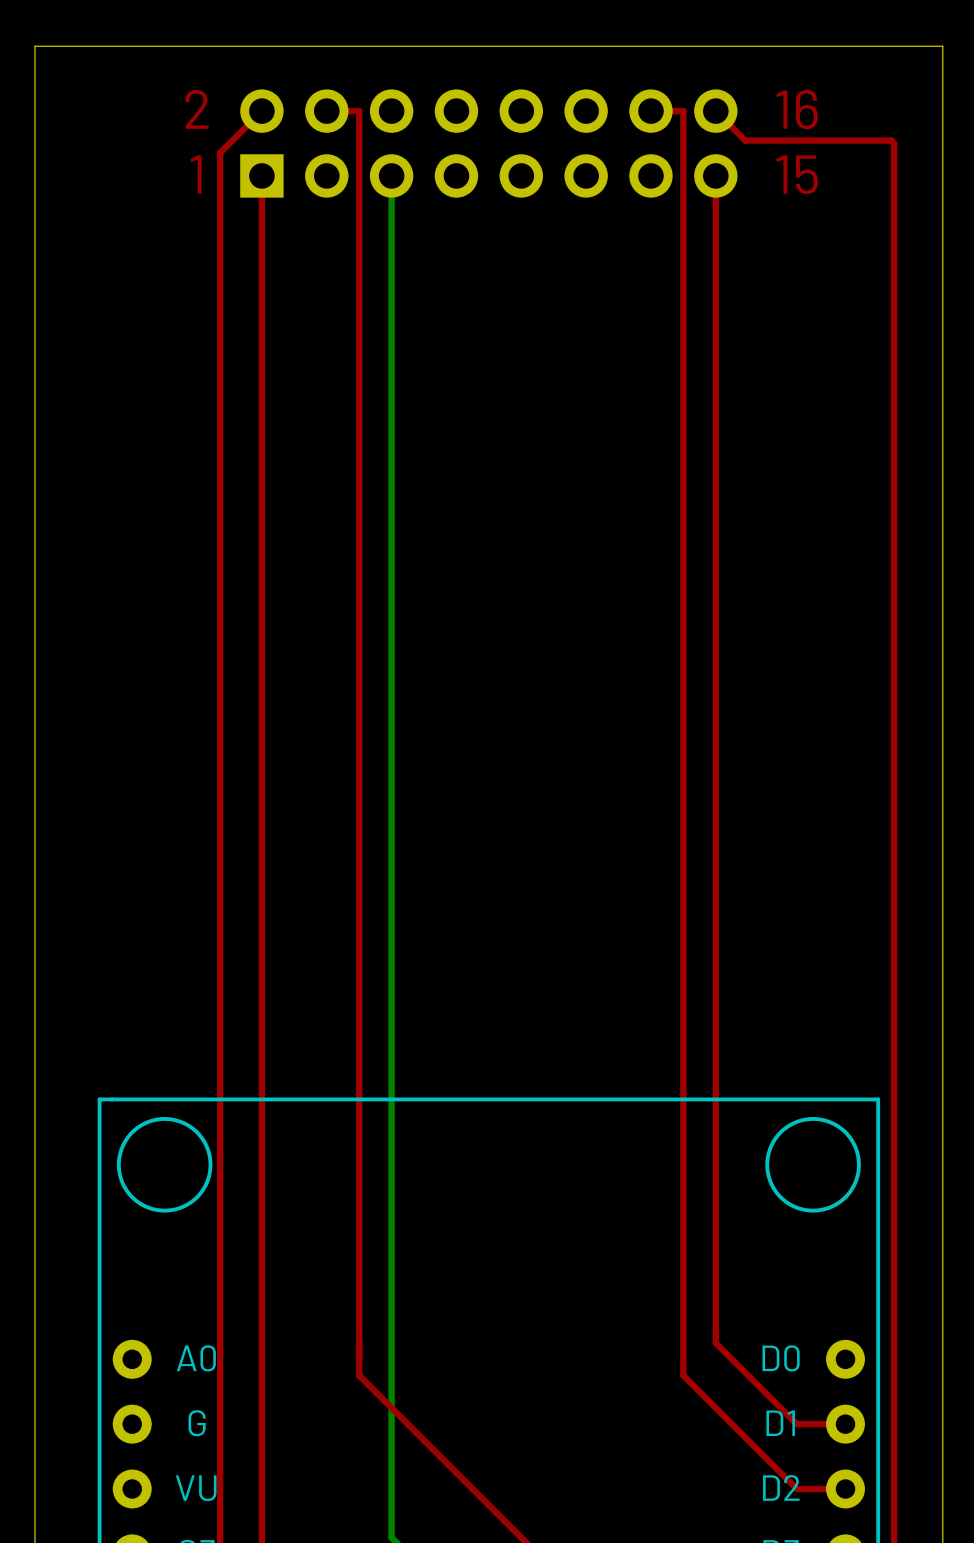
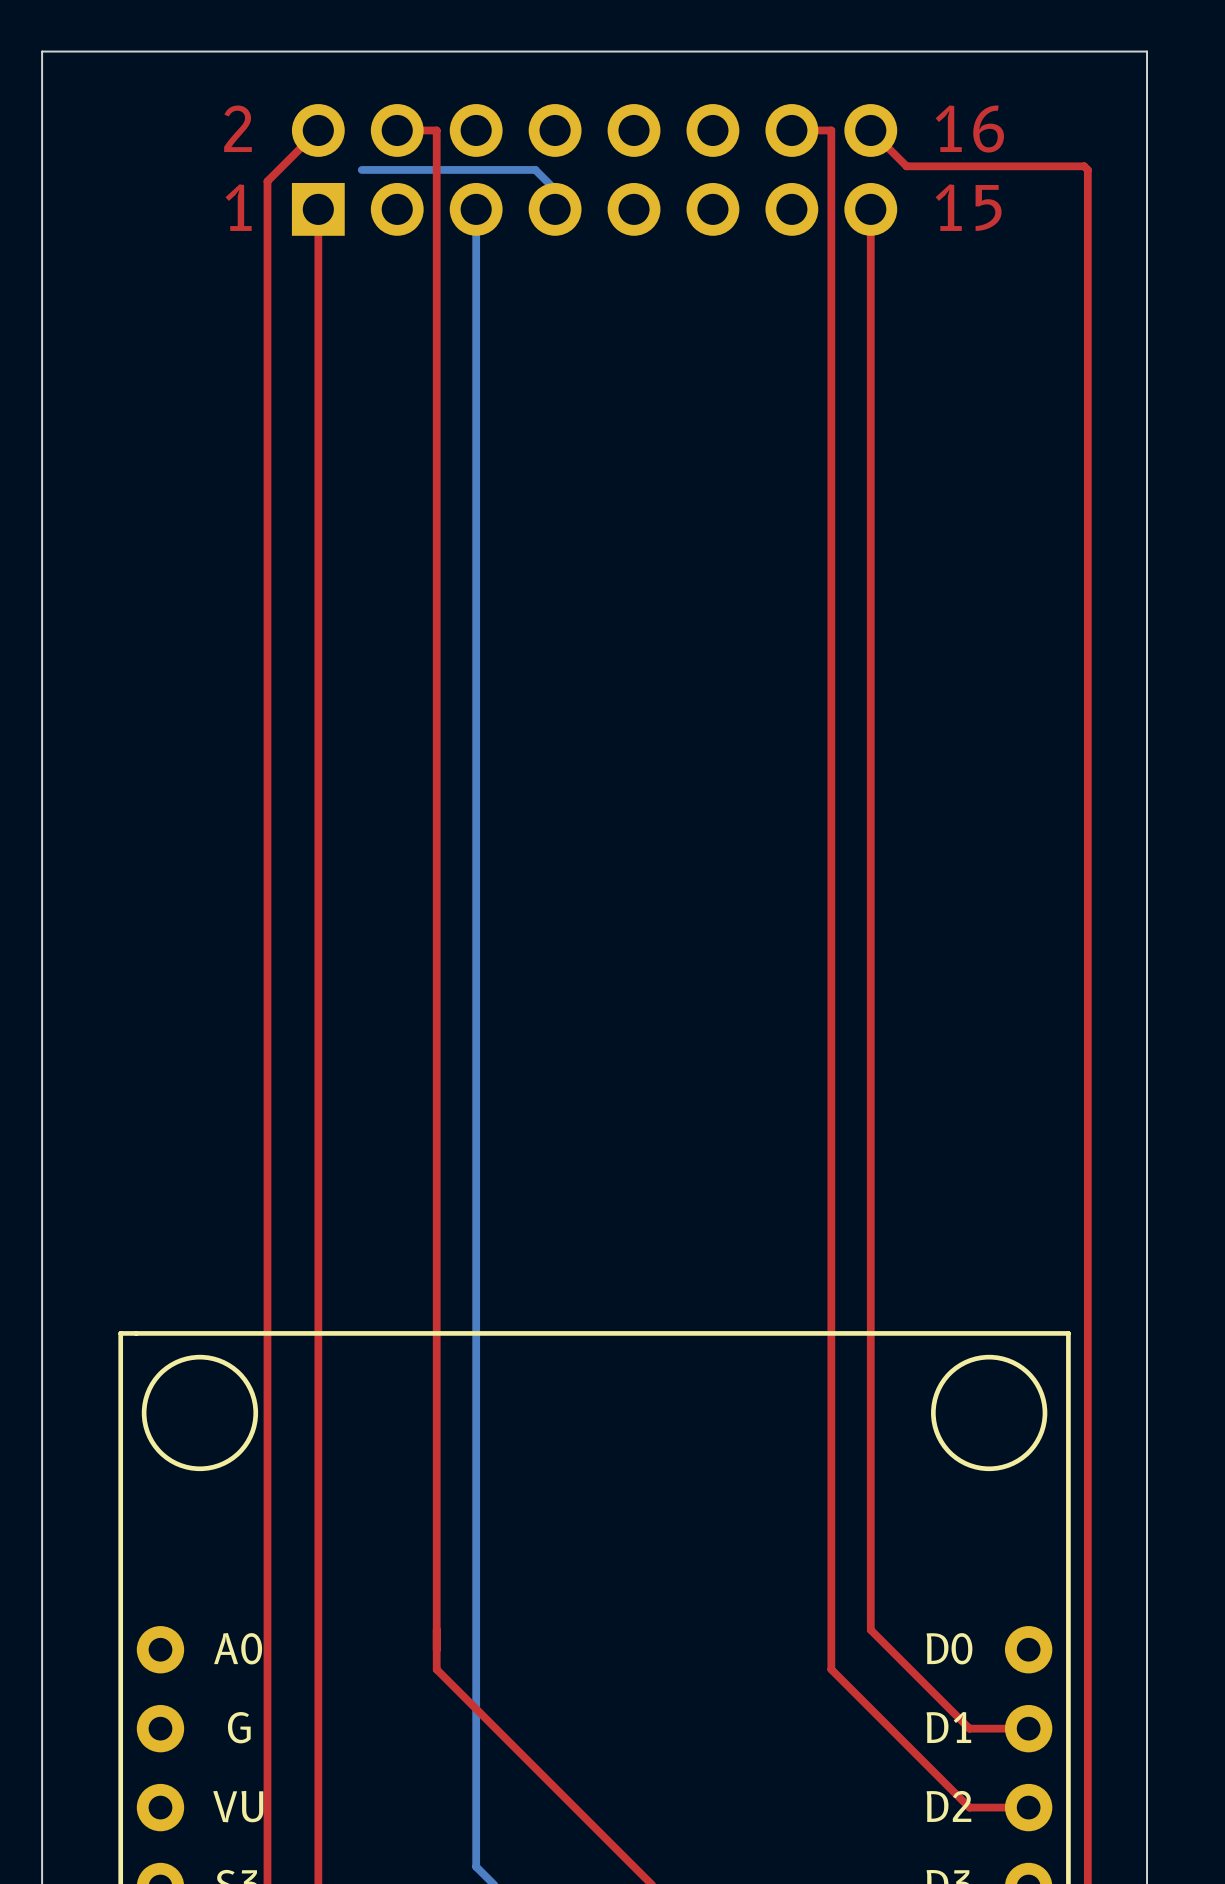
bottom track: none -> (361, 169) (535, 169) (555, 189)

